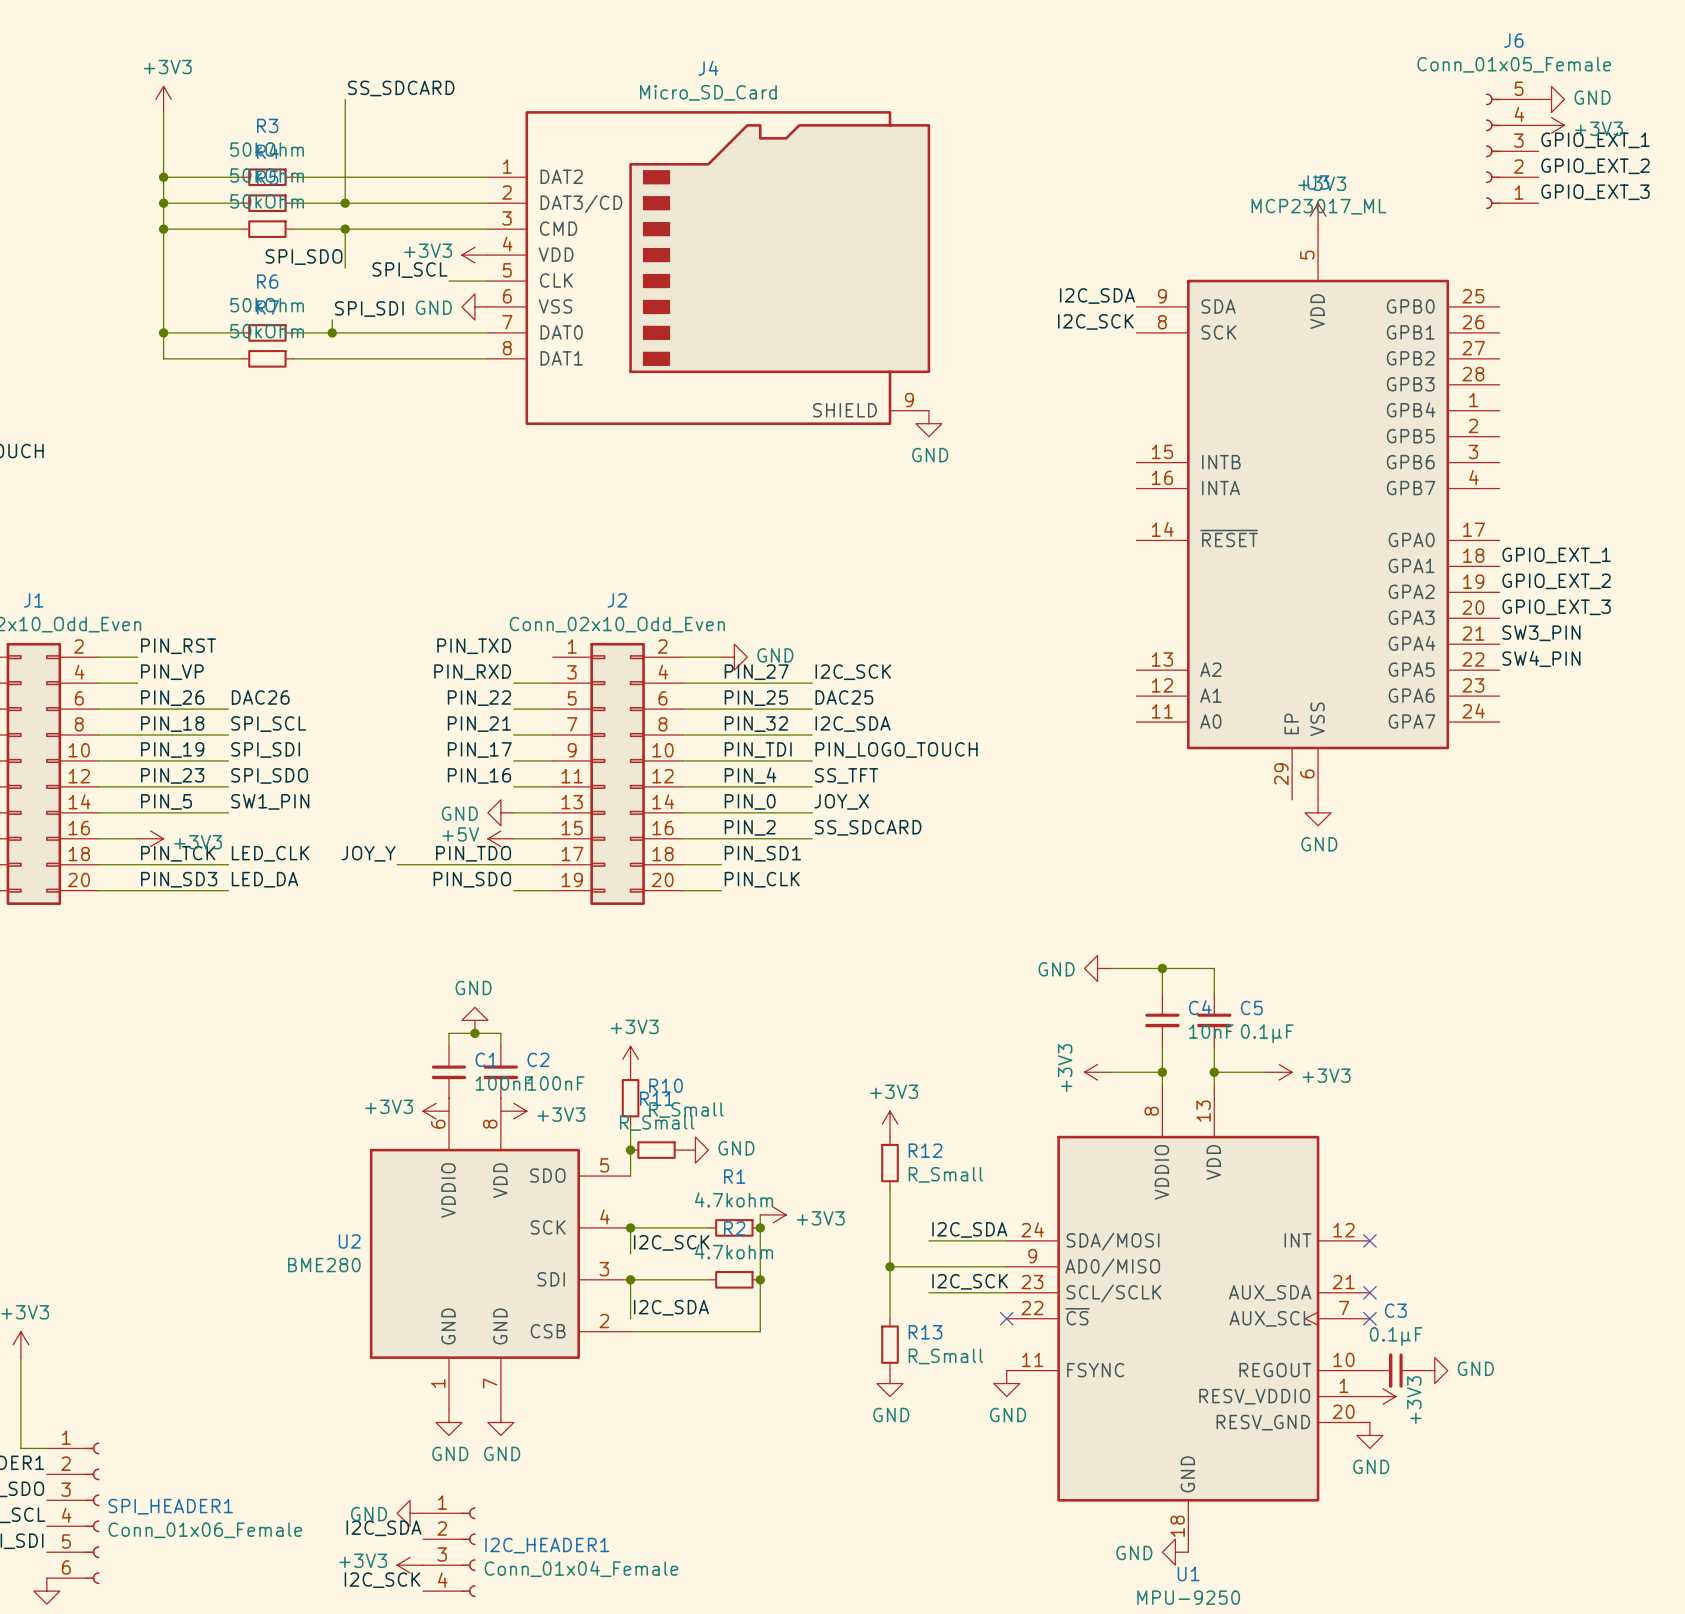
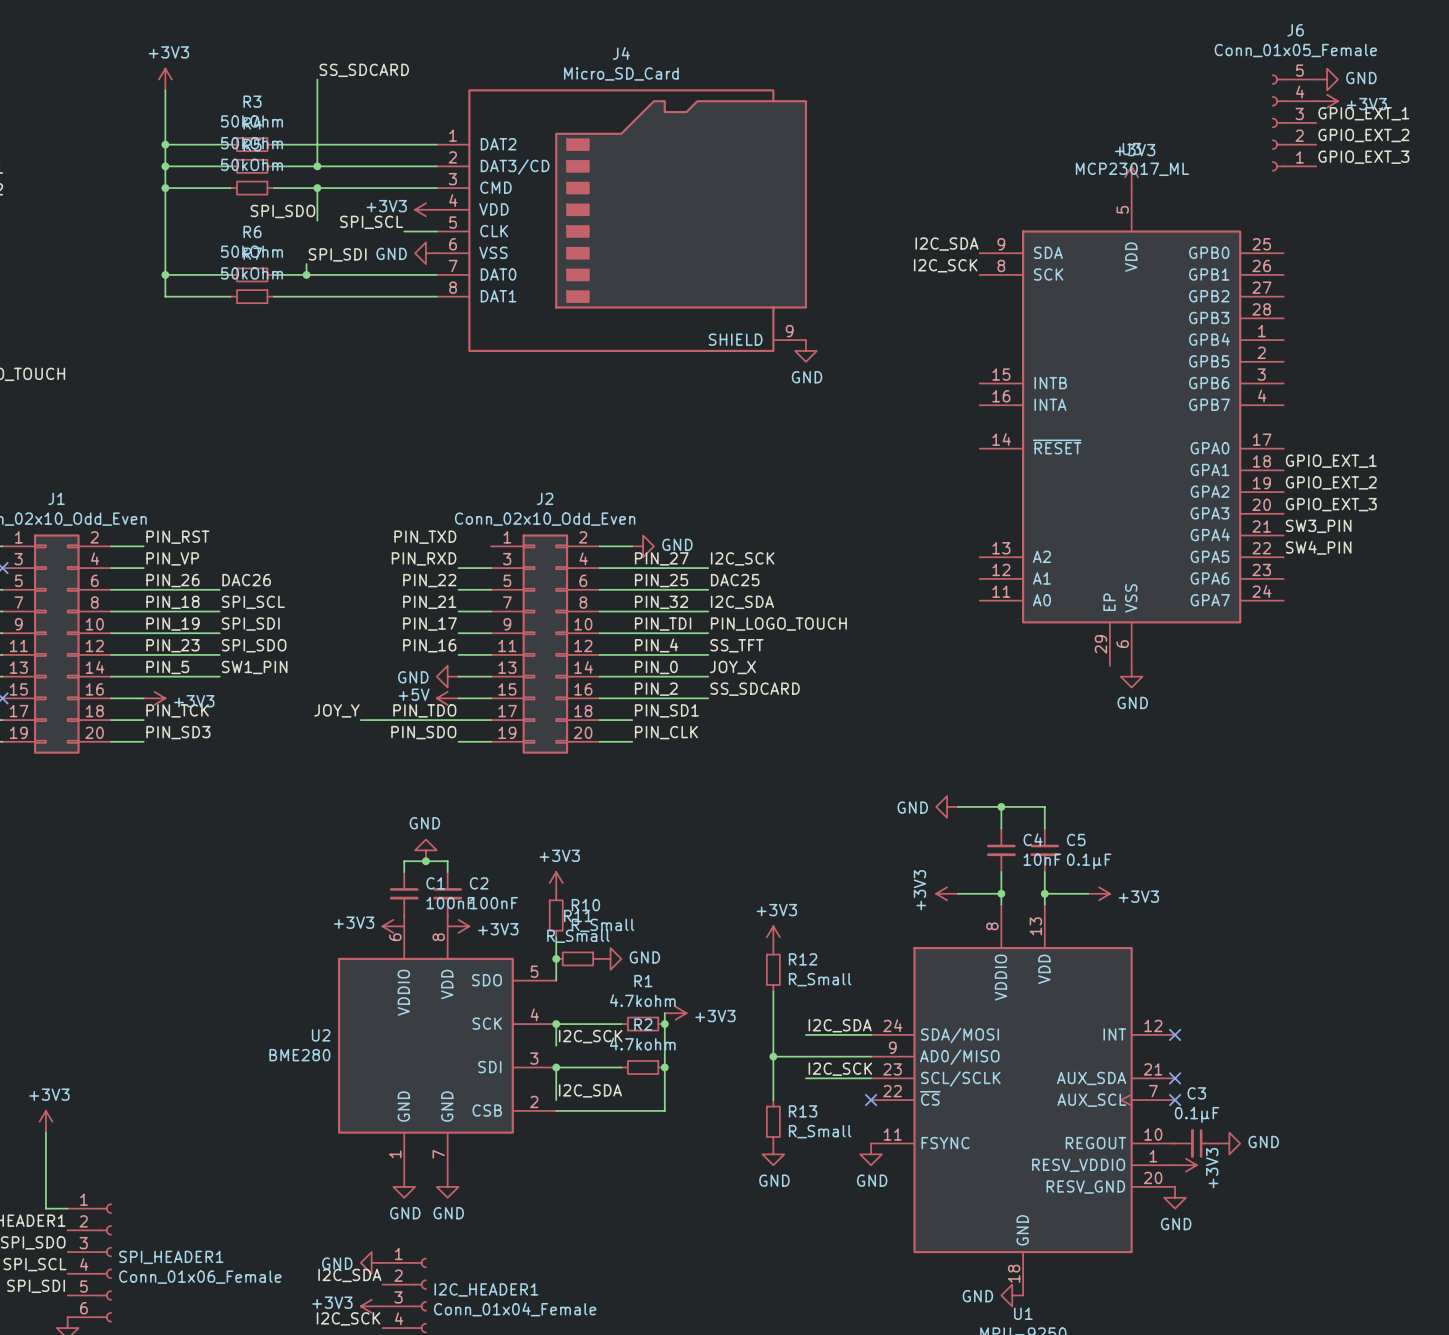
label: LED_CLK (270, 853) -> none
wire: (137, 864) (228, 864) -> none
label: LED_DA (265, 879) -> none
wire: (137, 890) (228, 890) -> none

